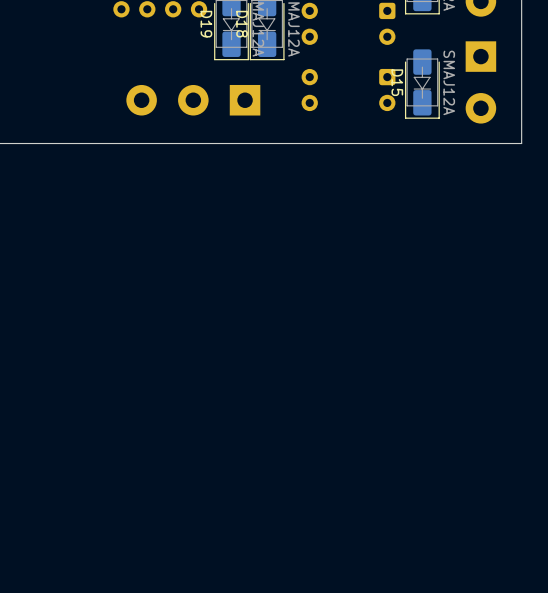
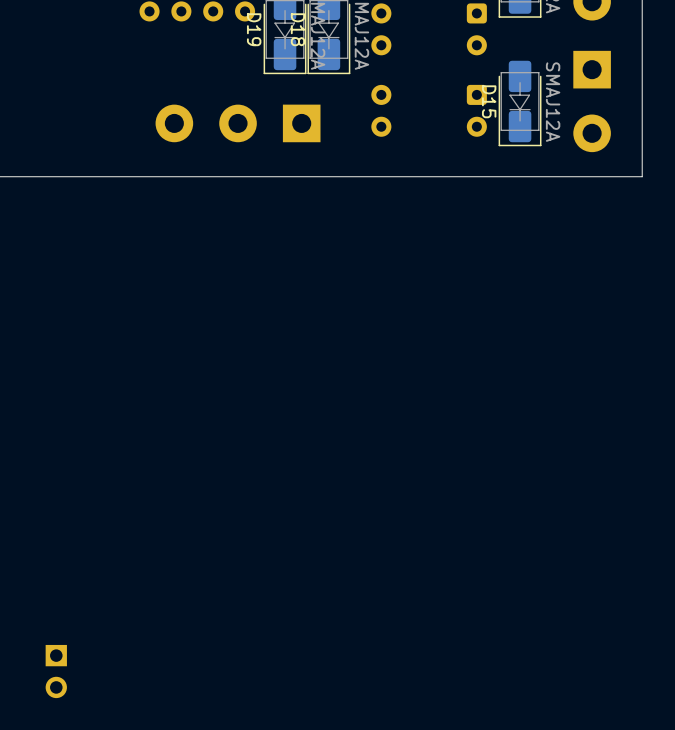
part: none -> (56, 671)

